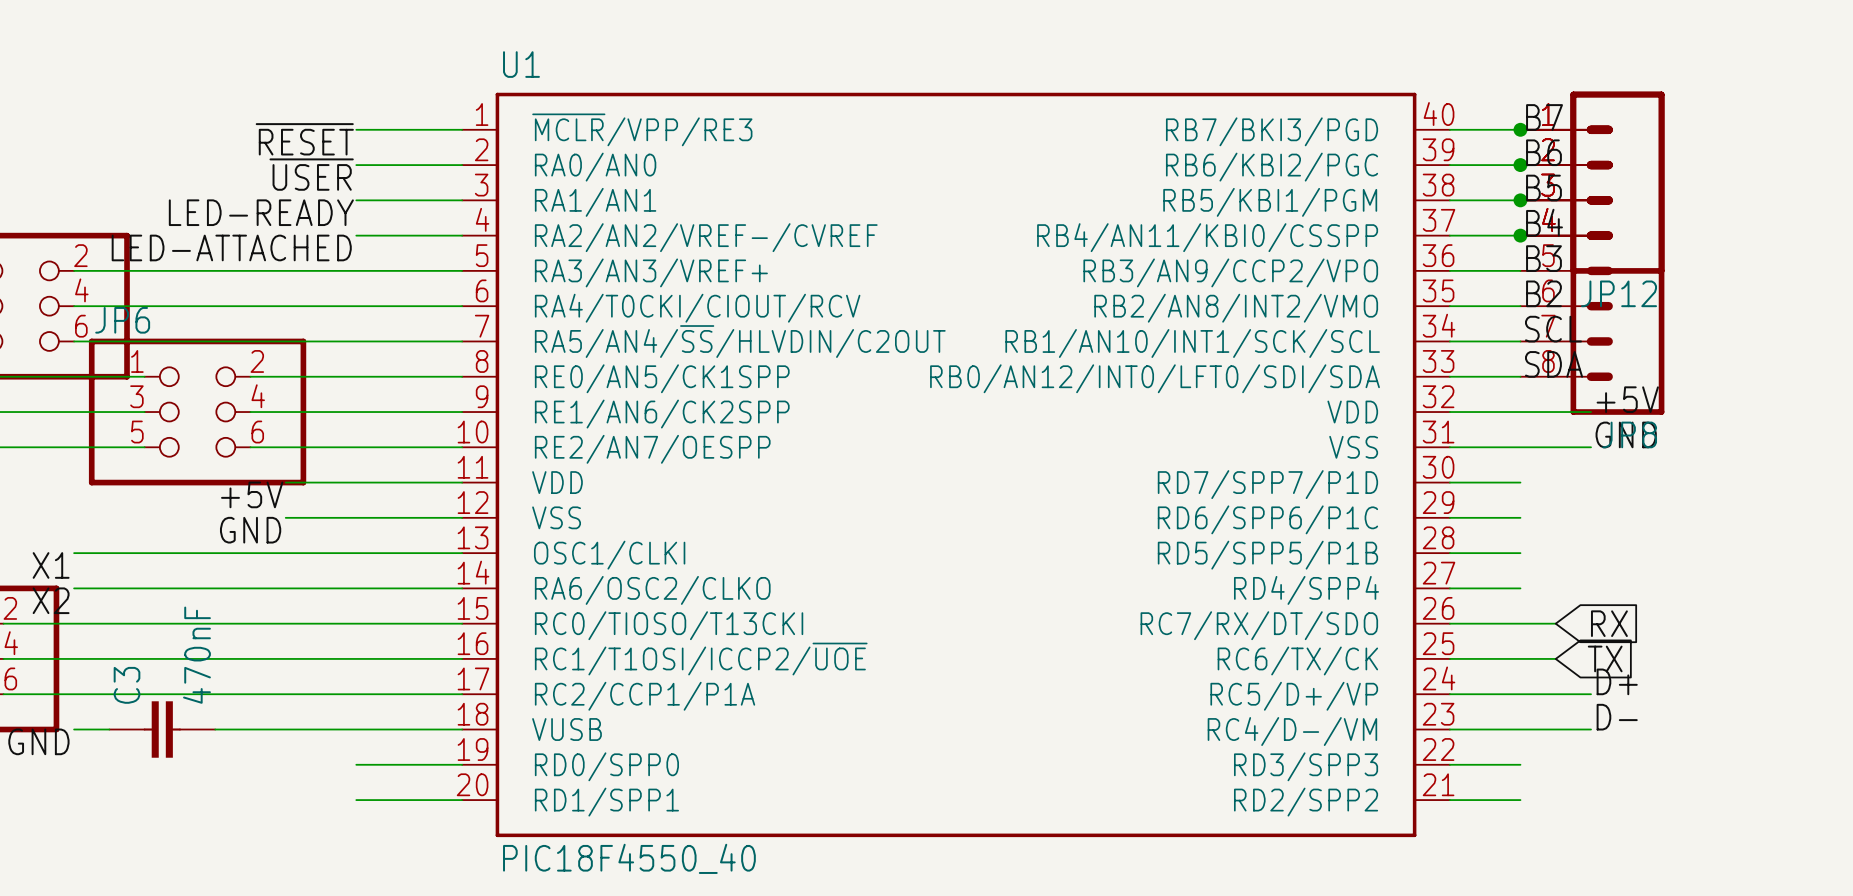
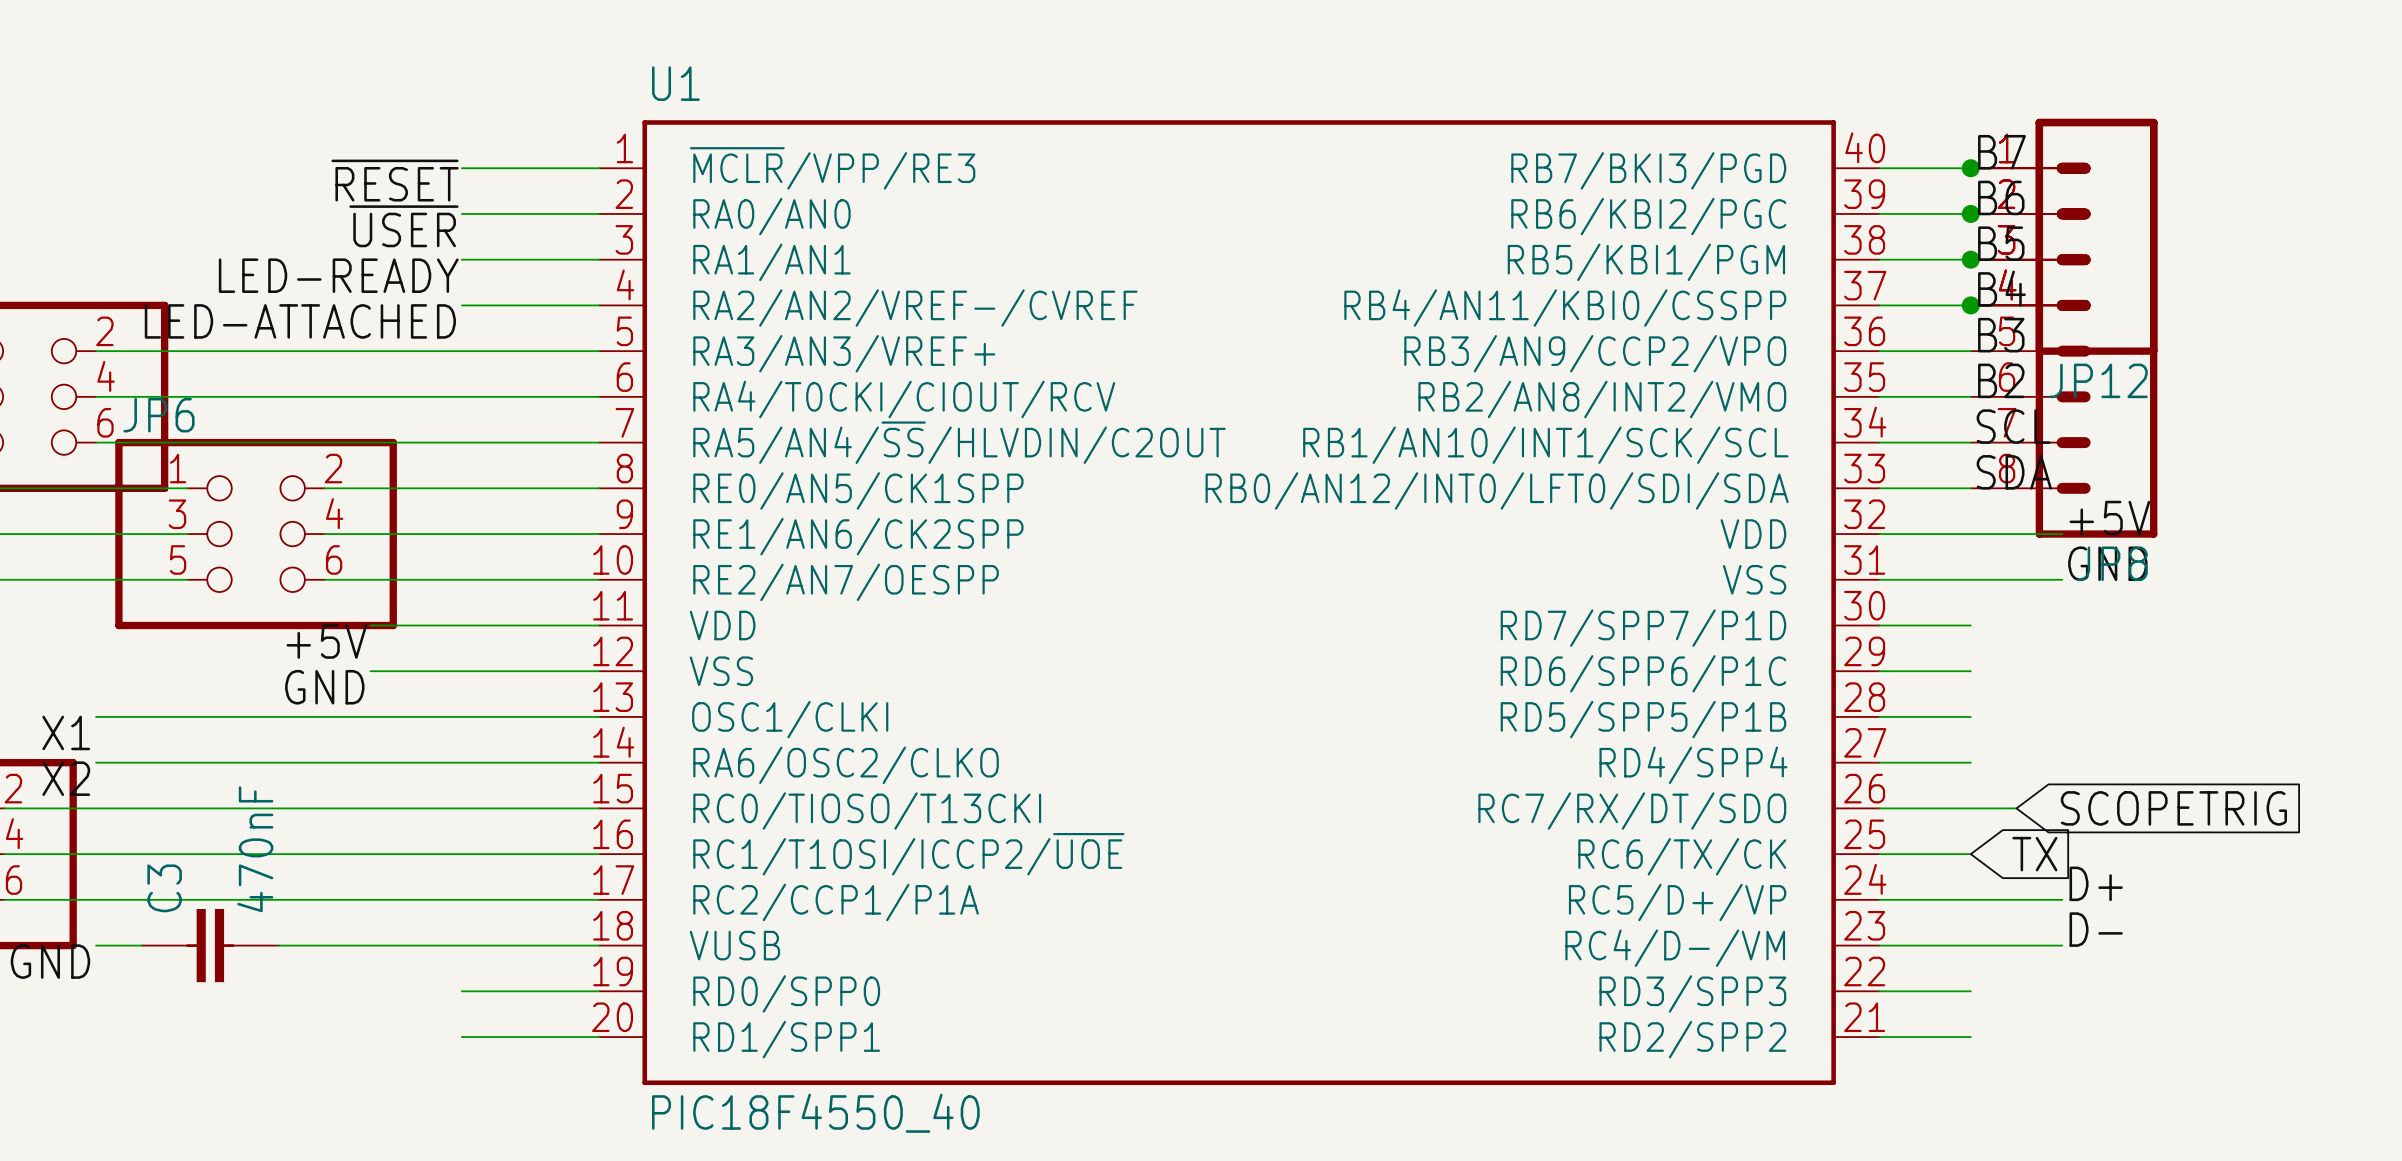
global label: RX (1609, 623) -> SCOPETRIG (2173, 808)
wire: (1520, 658) (1555, 658) -> none
global label position: TX (1605, 658) -> TX (2034, 854)

